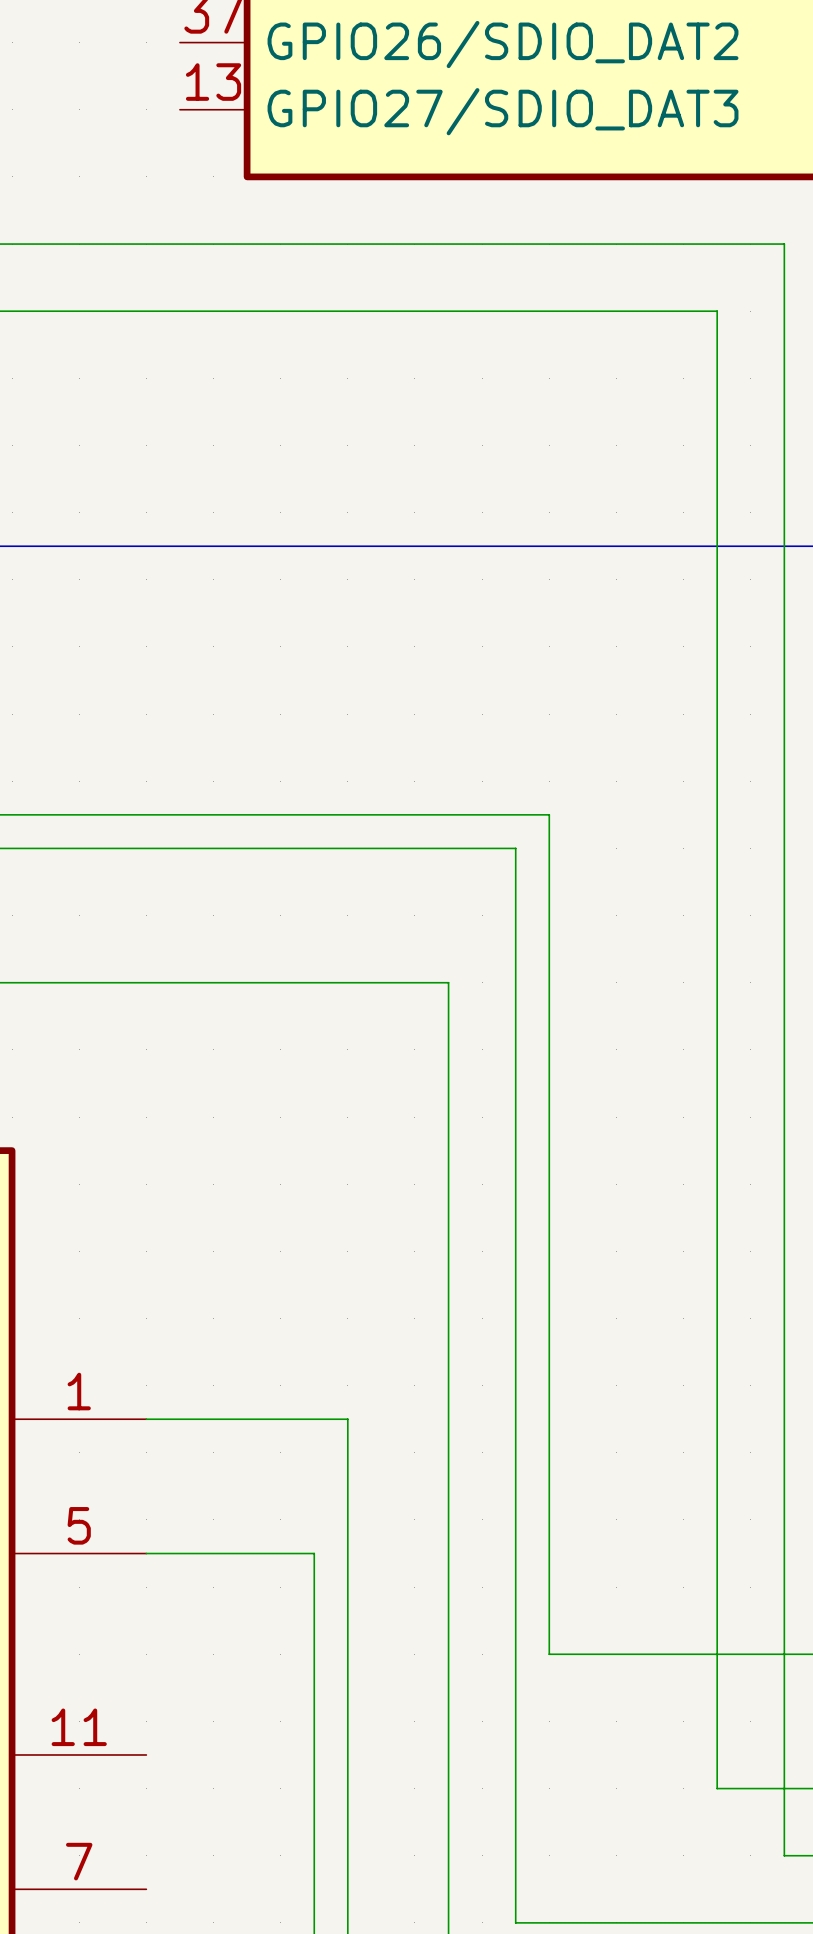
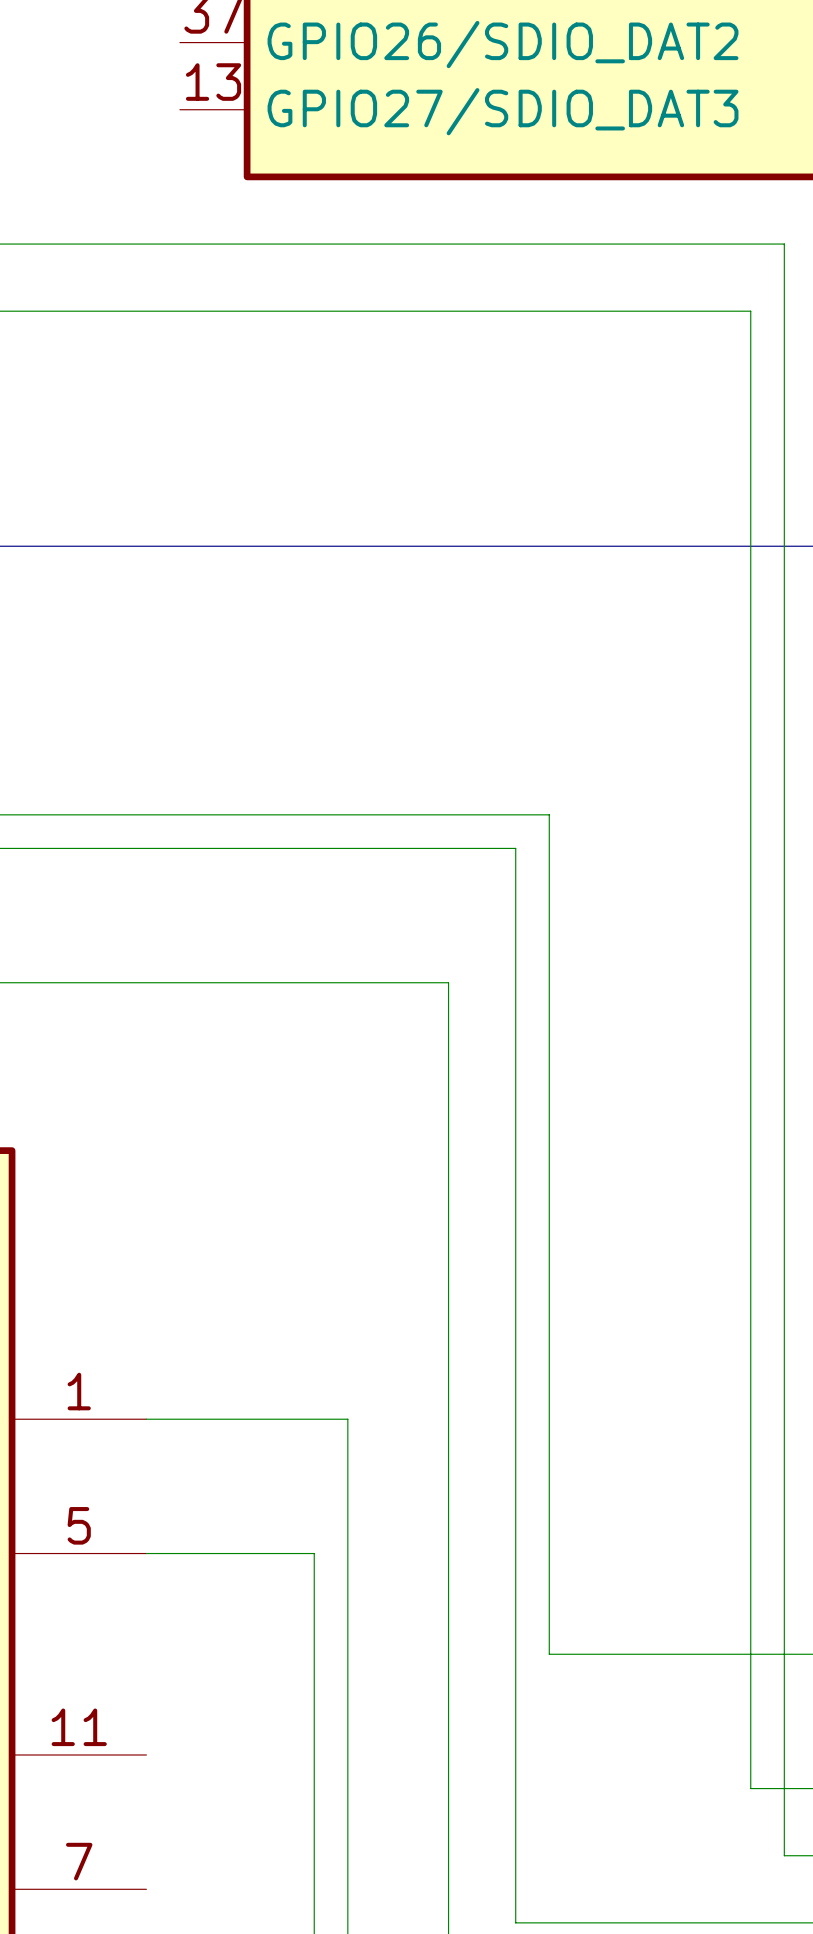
wire: (717, 311) (717, 1788) (750, 1788) -> (717, 311) (750, 311) (750, 1788)

